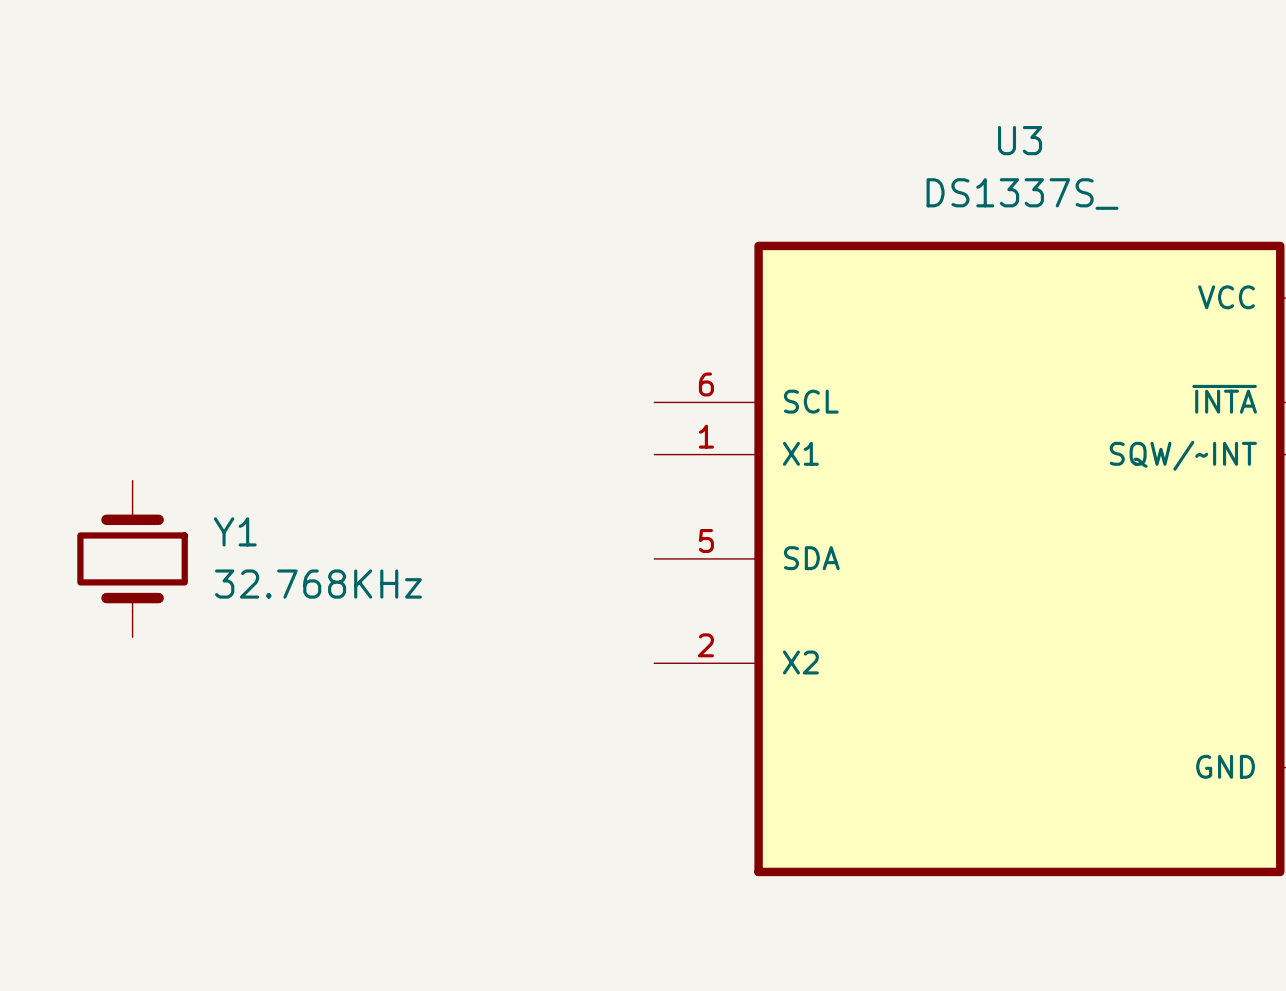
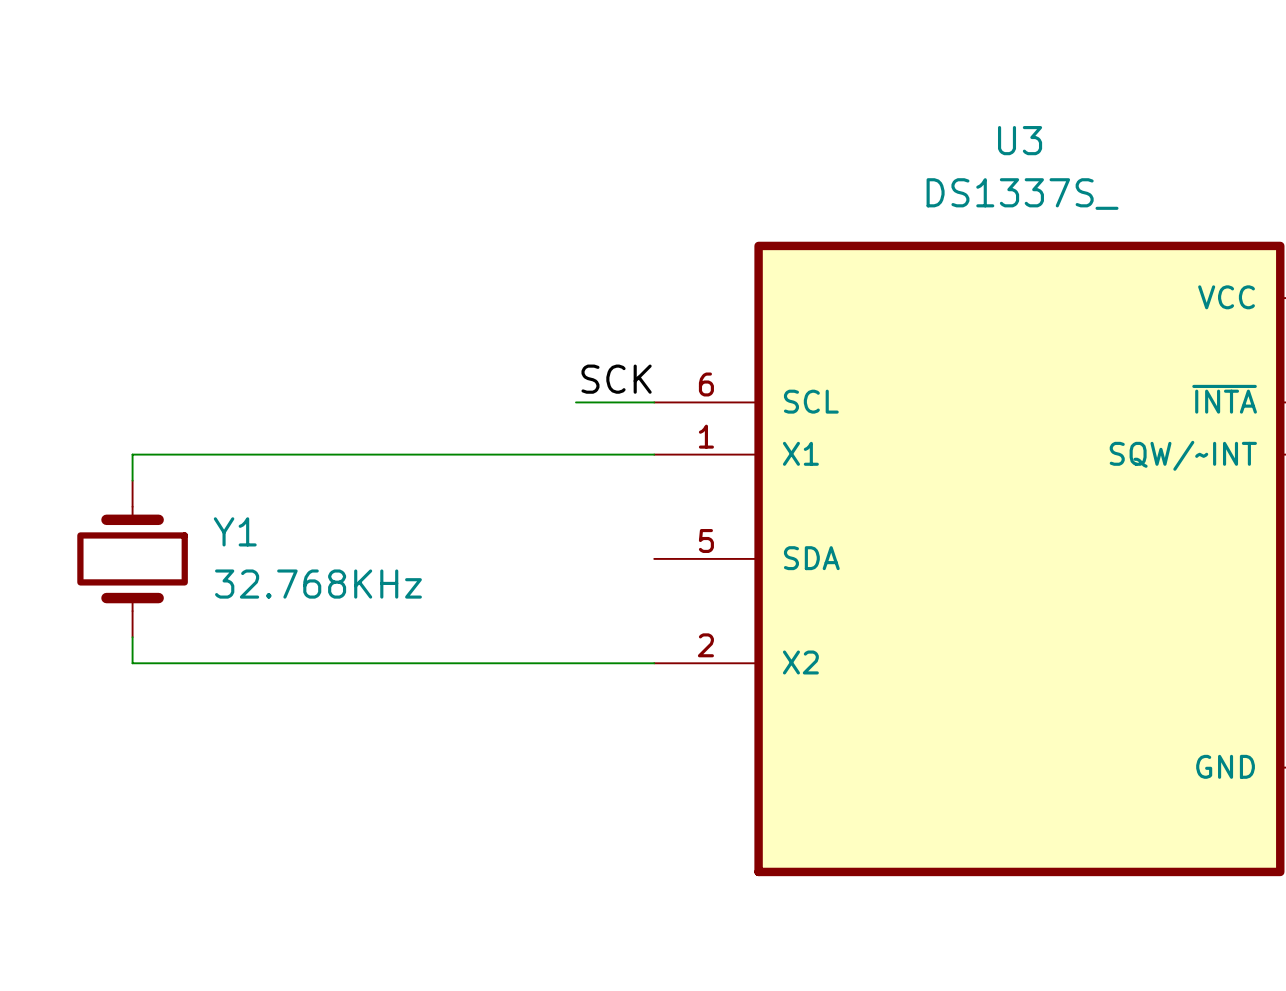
label: none -> SCK (616, 379)
wire: none -> (576, 402) (654, 402)
wire: none -> (654, 454) (132, 454) (132, 480)
wire: none -> (132, 637) (132, 663) (654, 663)

